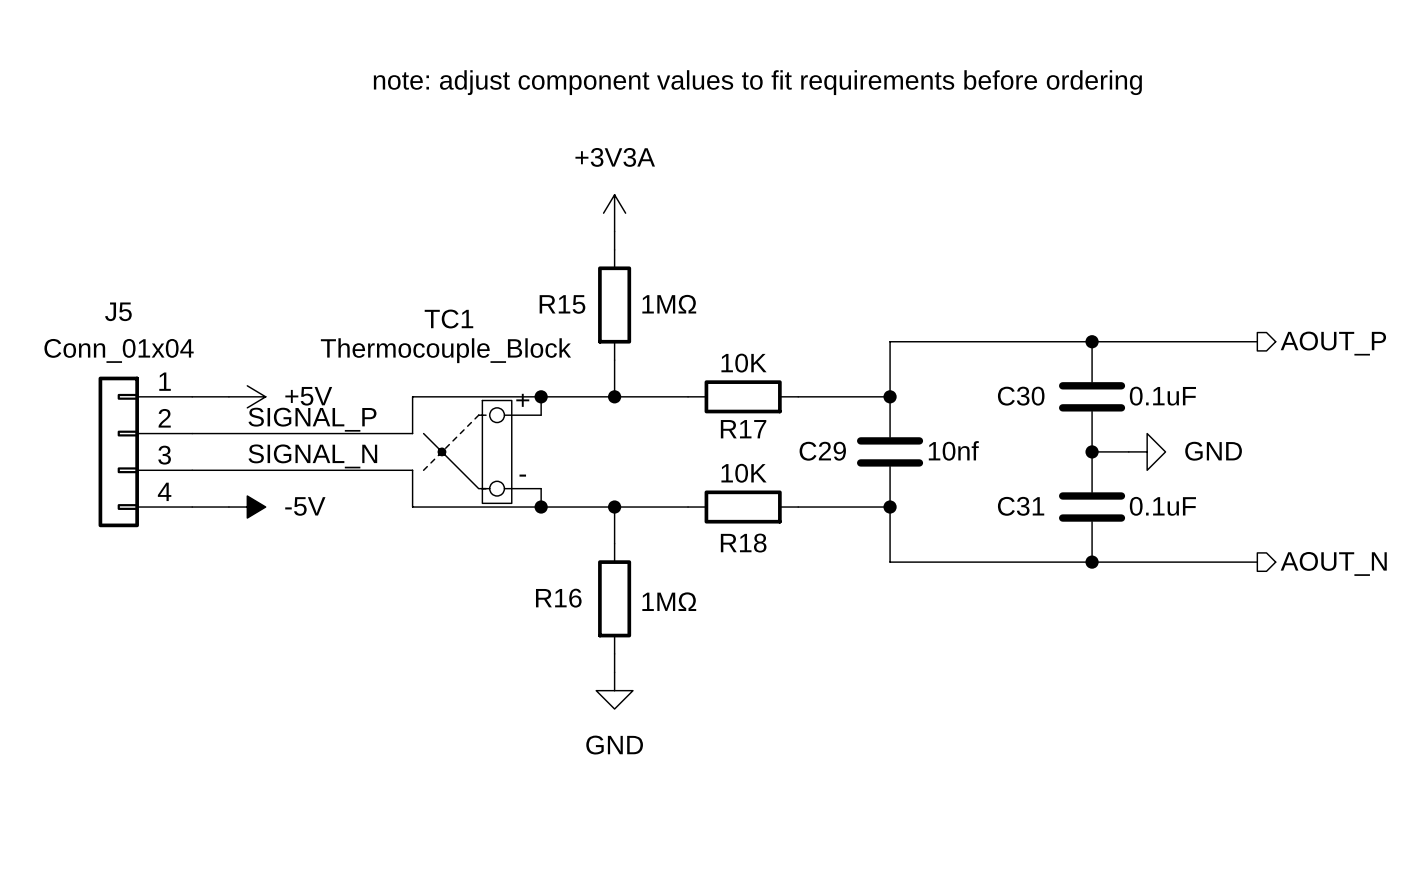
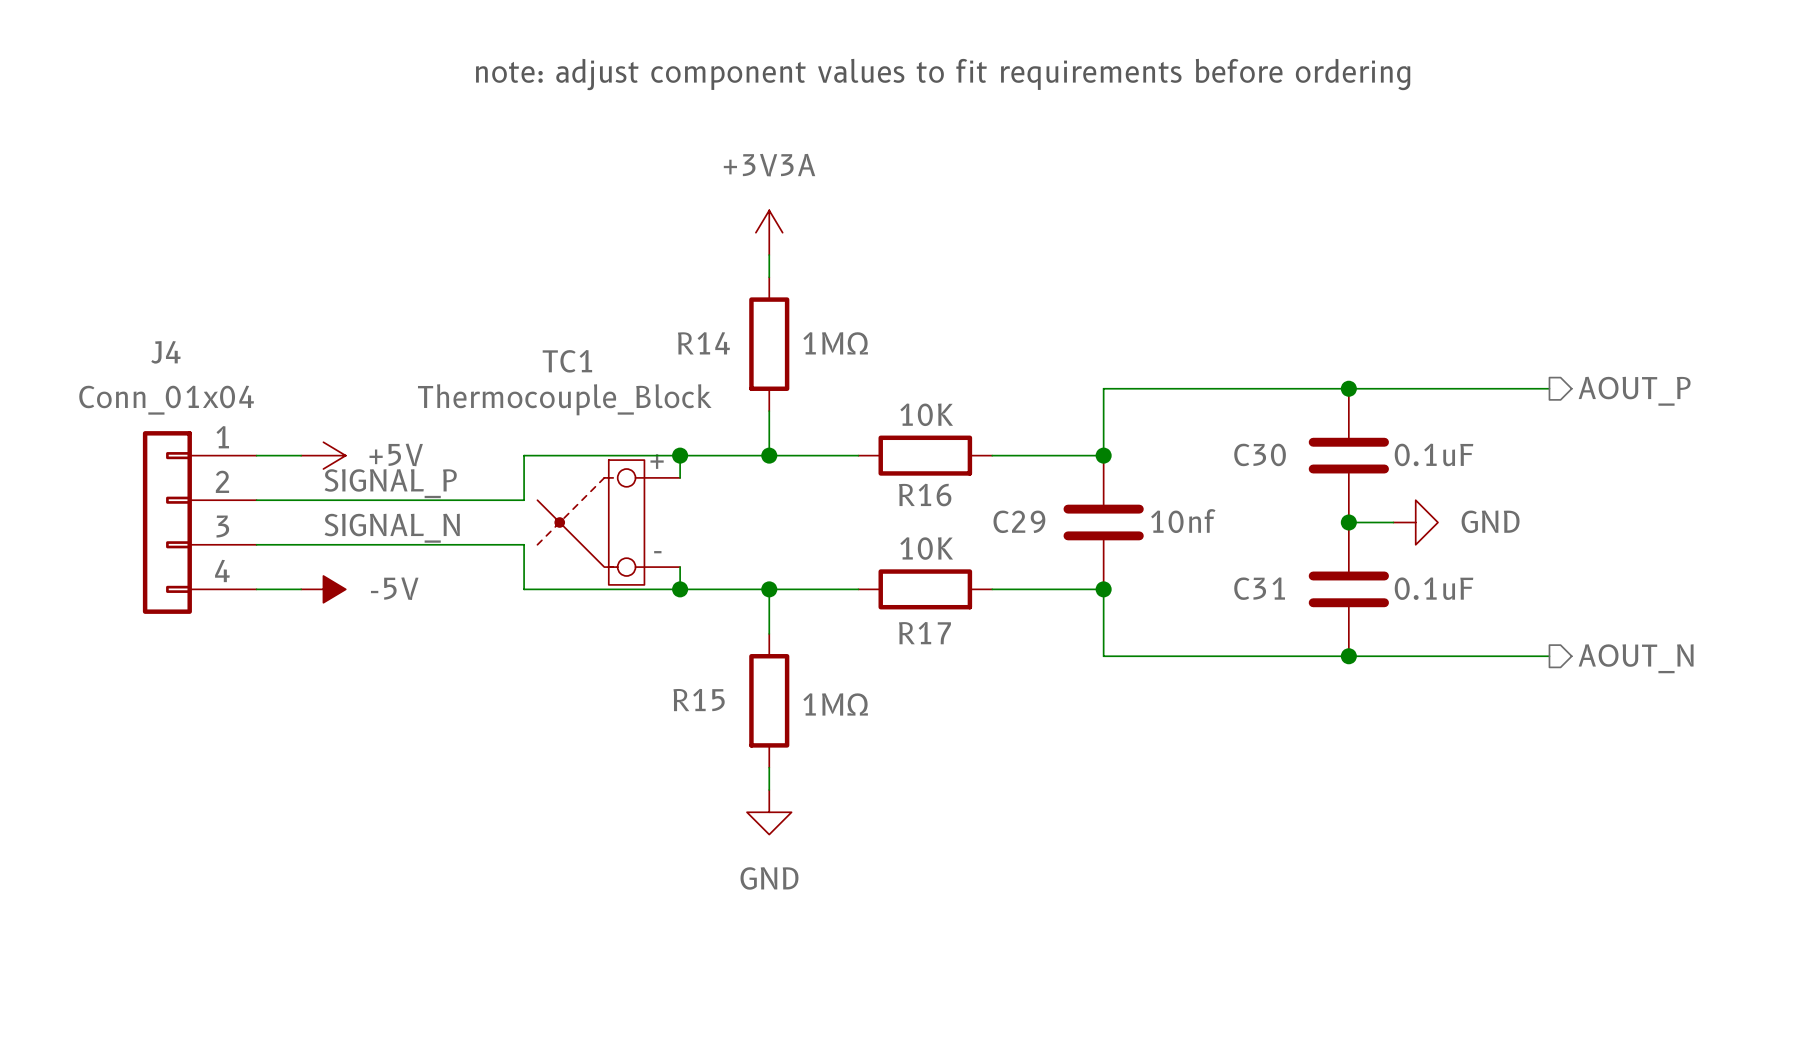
R15 name: R15 (562, 304) -> R14 (703, 343)
J5 name: J5 (118, 311) -> J4 (165, 352)
R17 name: R17 (743, 429) -> R16 (925, 495)
R18 name: R18 (743, 543) -> R17 (924, 633)
R16 name: R16 (558, 598) -> R15 (699, 699)

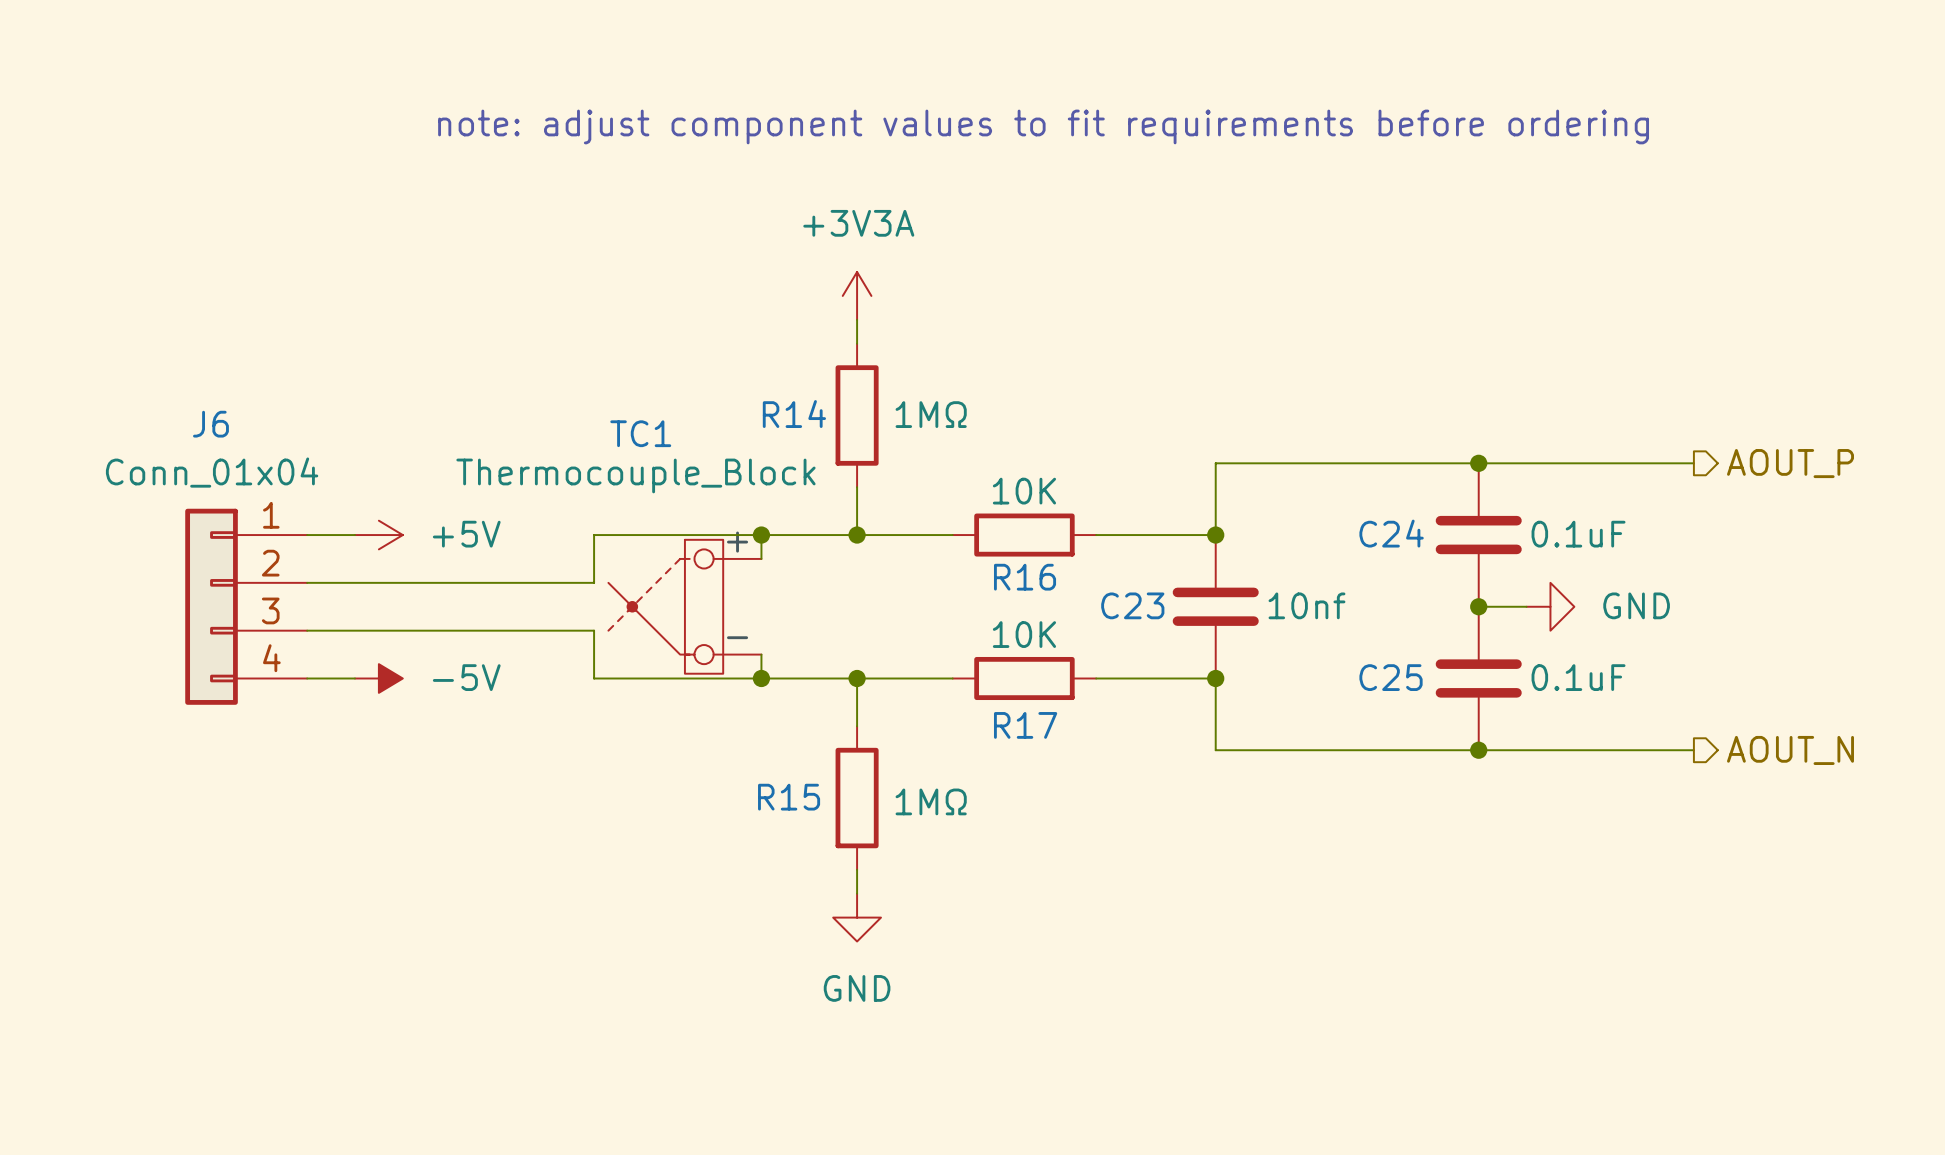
J4 name: J4 (165, 352) -> J6 (210, 424)
C30 name: C30 (1260, 454) -> C24 (1391, 533)
label: SIGNAL_P (390, 483) -> none
C29 name: C29 (1019, 521) -> C23 (1132, 605)
label: SIGNAL_N (392, 528) -> none
C31 name: C31 (1259, 588) -> C25 (1391, 677)

